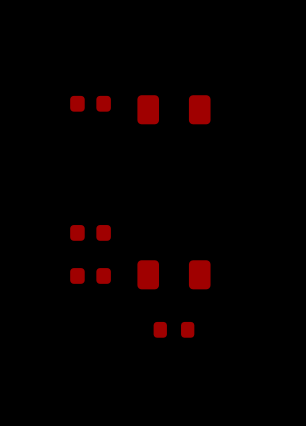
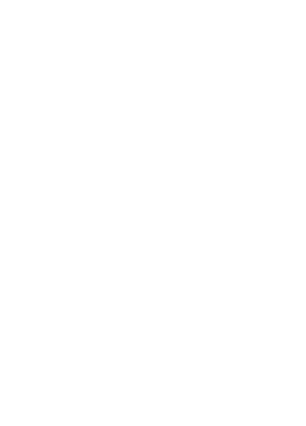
part: (90, 103) -> none
part: (173, 109) -> none
part: (90, 232) -> none
part: (173, 274) -> none
part: (90, 275) -> none
part: (173, 329) -> none

